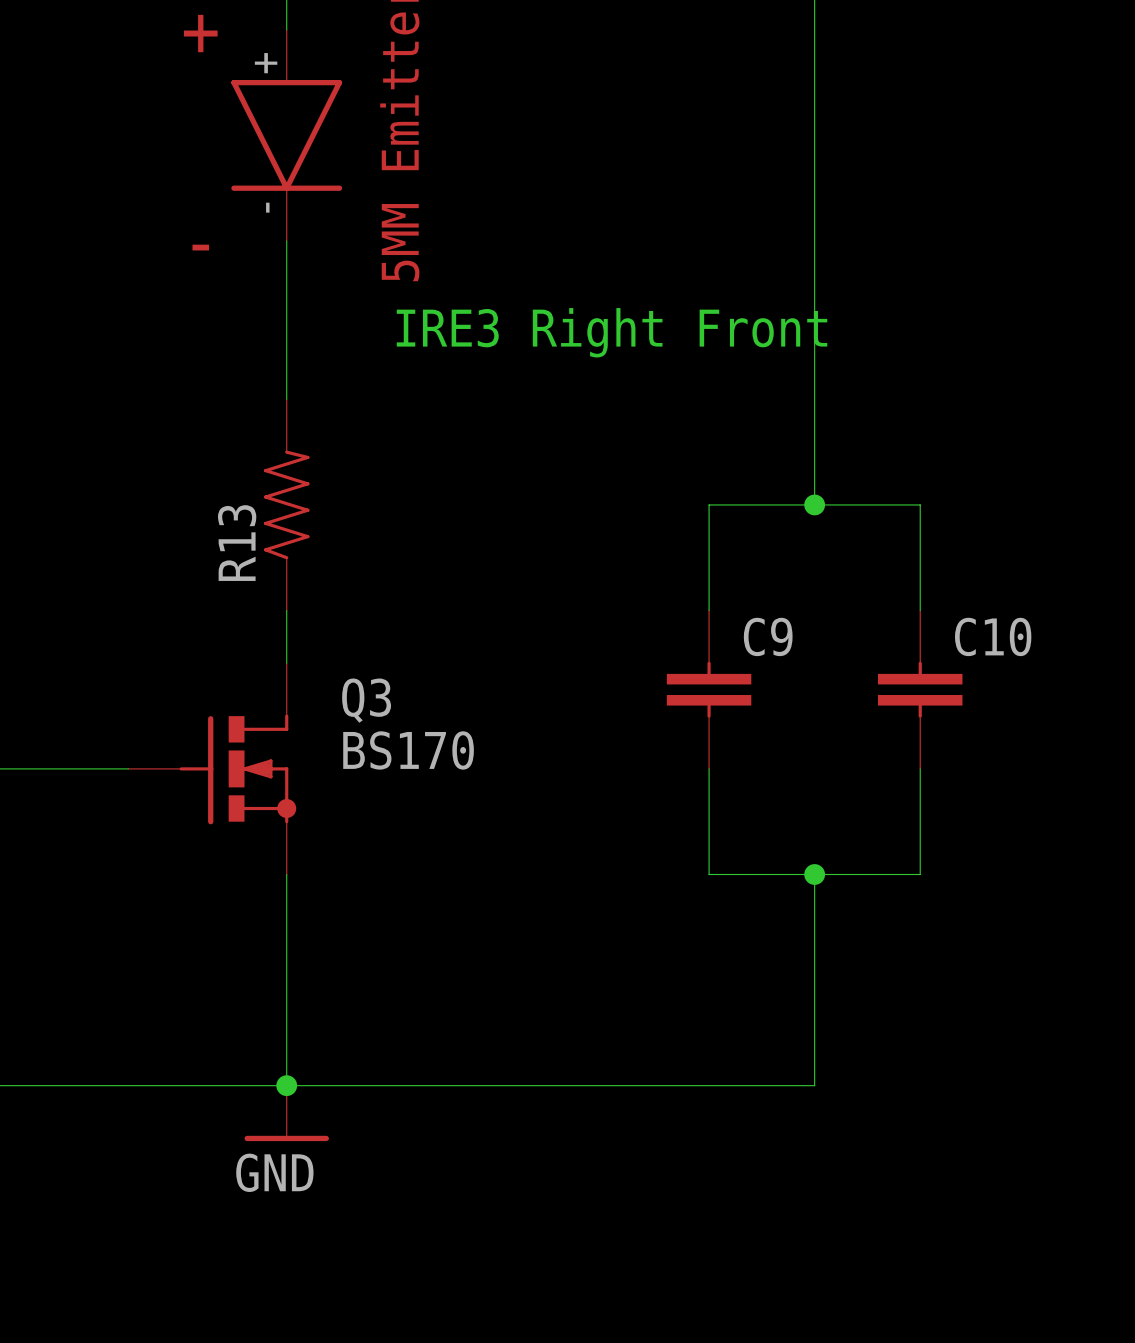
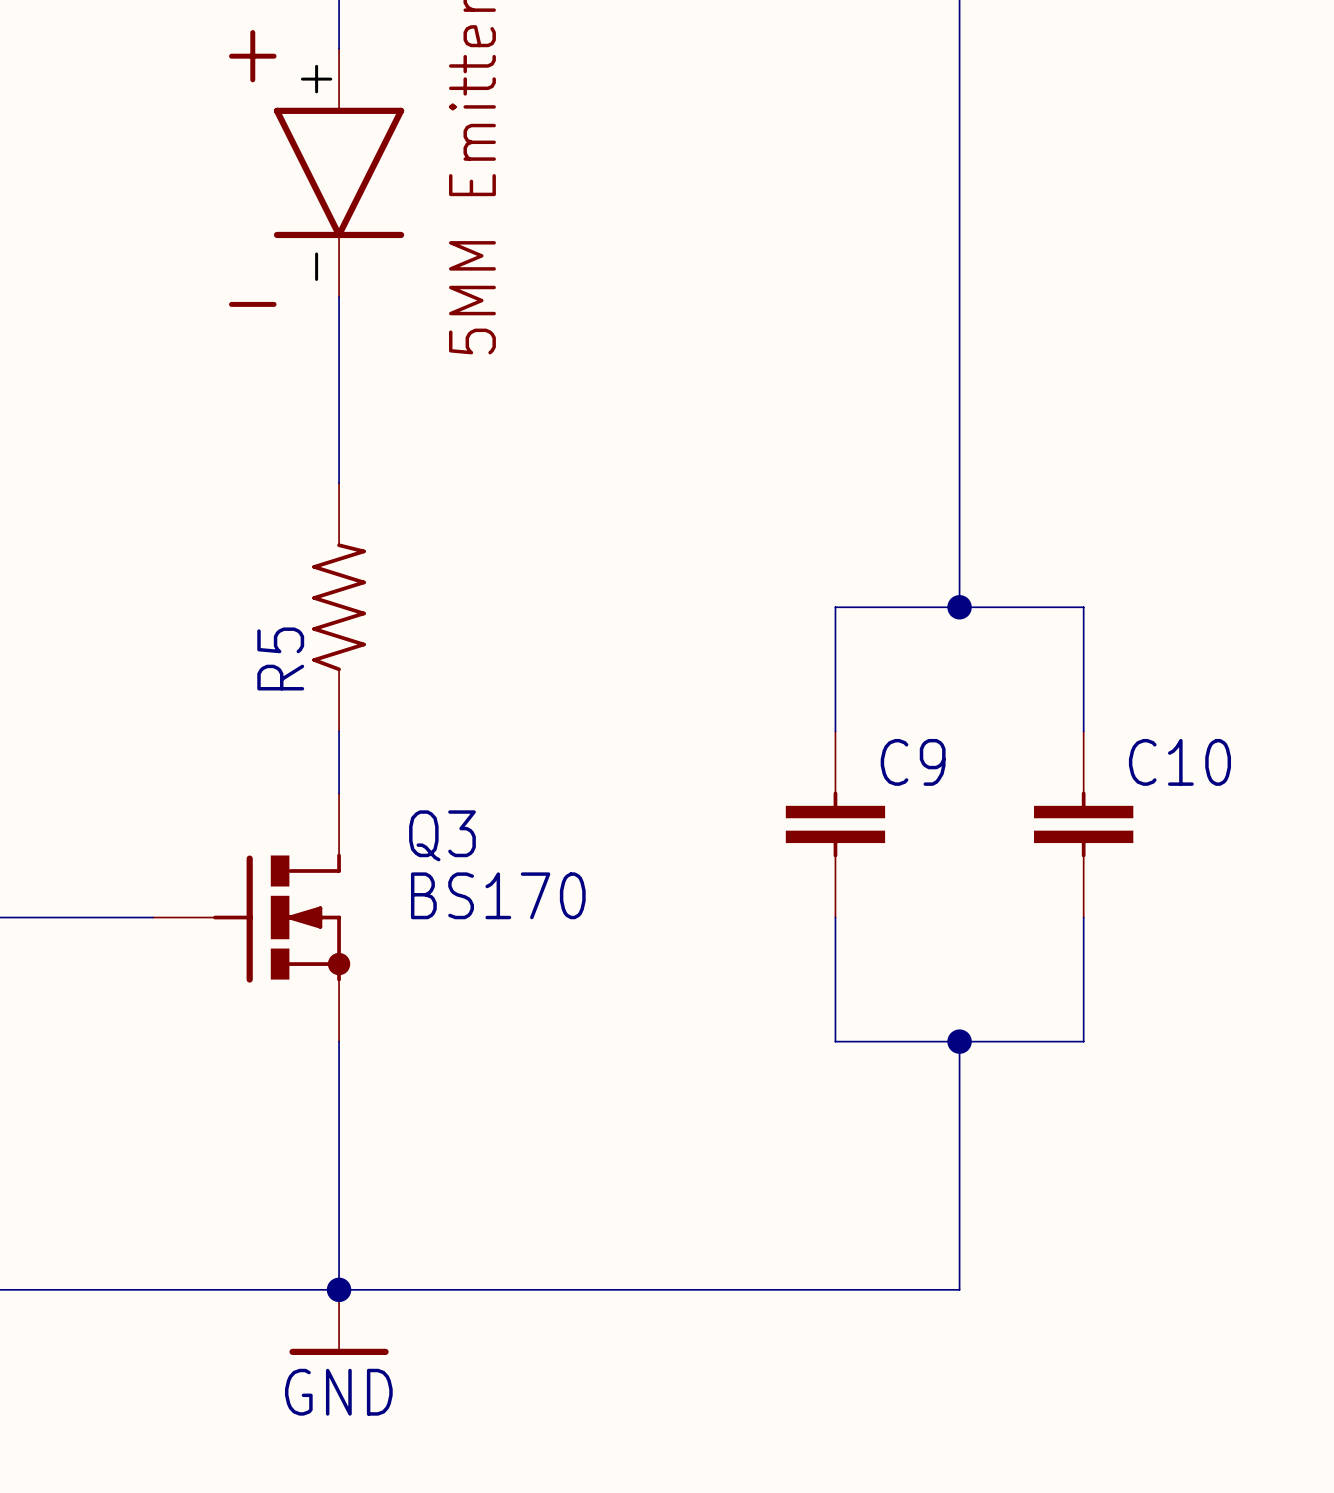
text: IRE3 Right Front (612, 332) -> none
R13 name: R13 (237, 543) -> R5 (280, 658)

